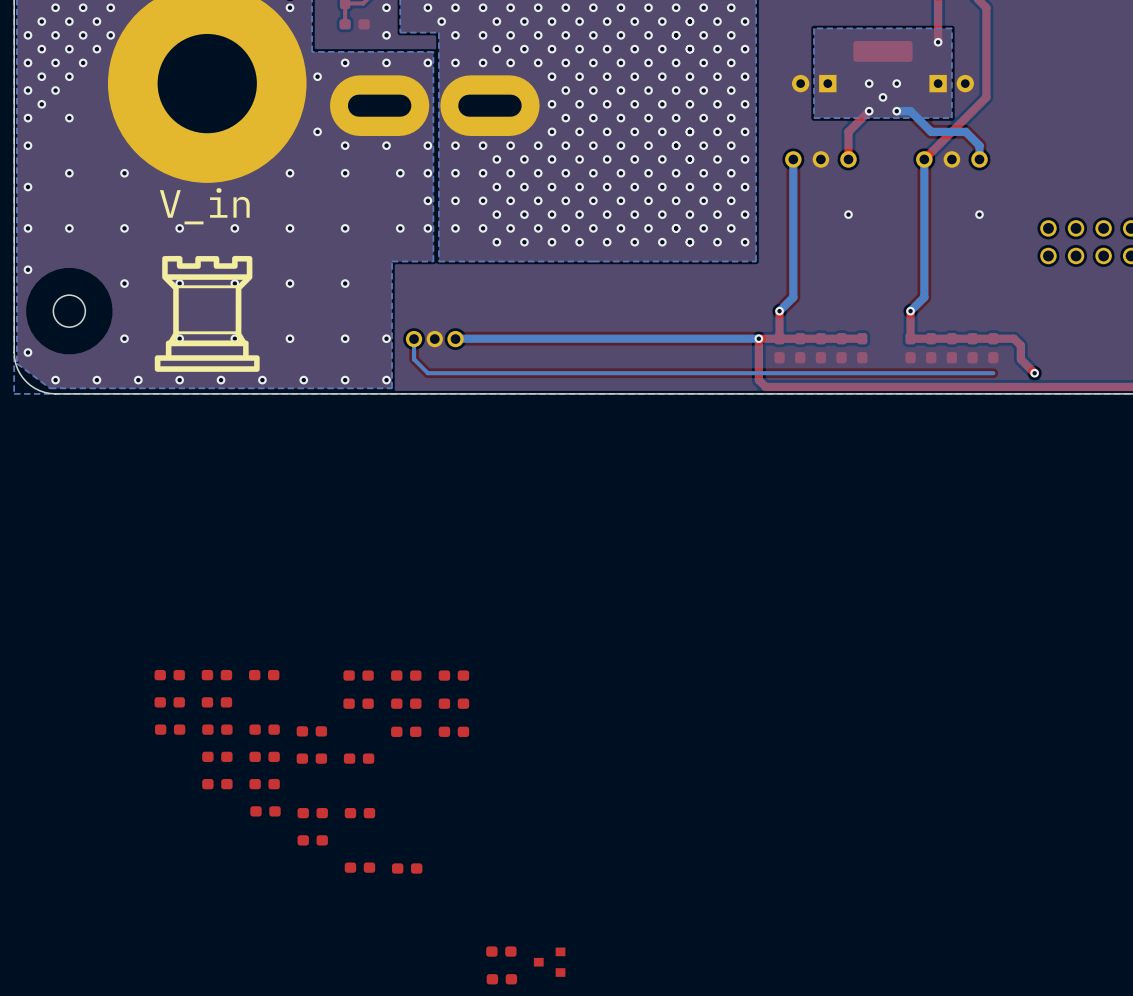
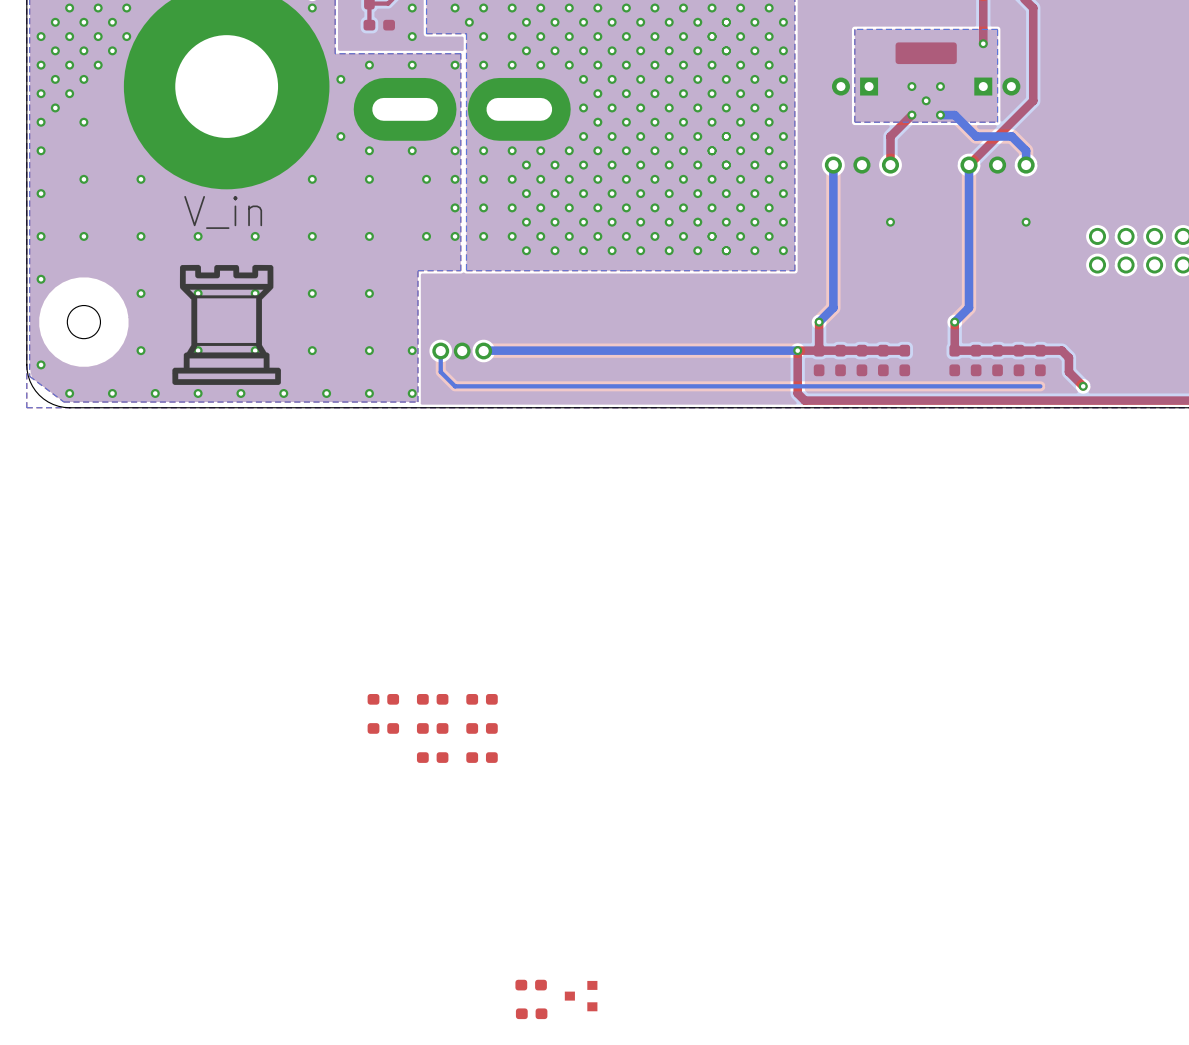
part: (169, 675) -> none
part: (216, 675) -> none
part: (264, 675) -> none
part: (169, 702) -> none
part: (216, 702) -> none
part: (170, 729) -> none
part: (217, 729) -> none
part: (264, 729) -> none
part: (311, 731) -> none
part: (217, 756) -> none
part: (264, 756) -> none
part: (311, 758) -> none
part: (359, 758) -> none
part: (217, 784) -> none
part: (264, 784) -> none
part: (265, 811) -> none
part: (312, 813) -> none
part: (359, 813) -> none
part: (312, 840) -> none
part: (359, 867) -> none
part: (407, 868) -> none

